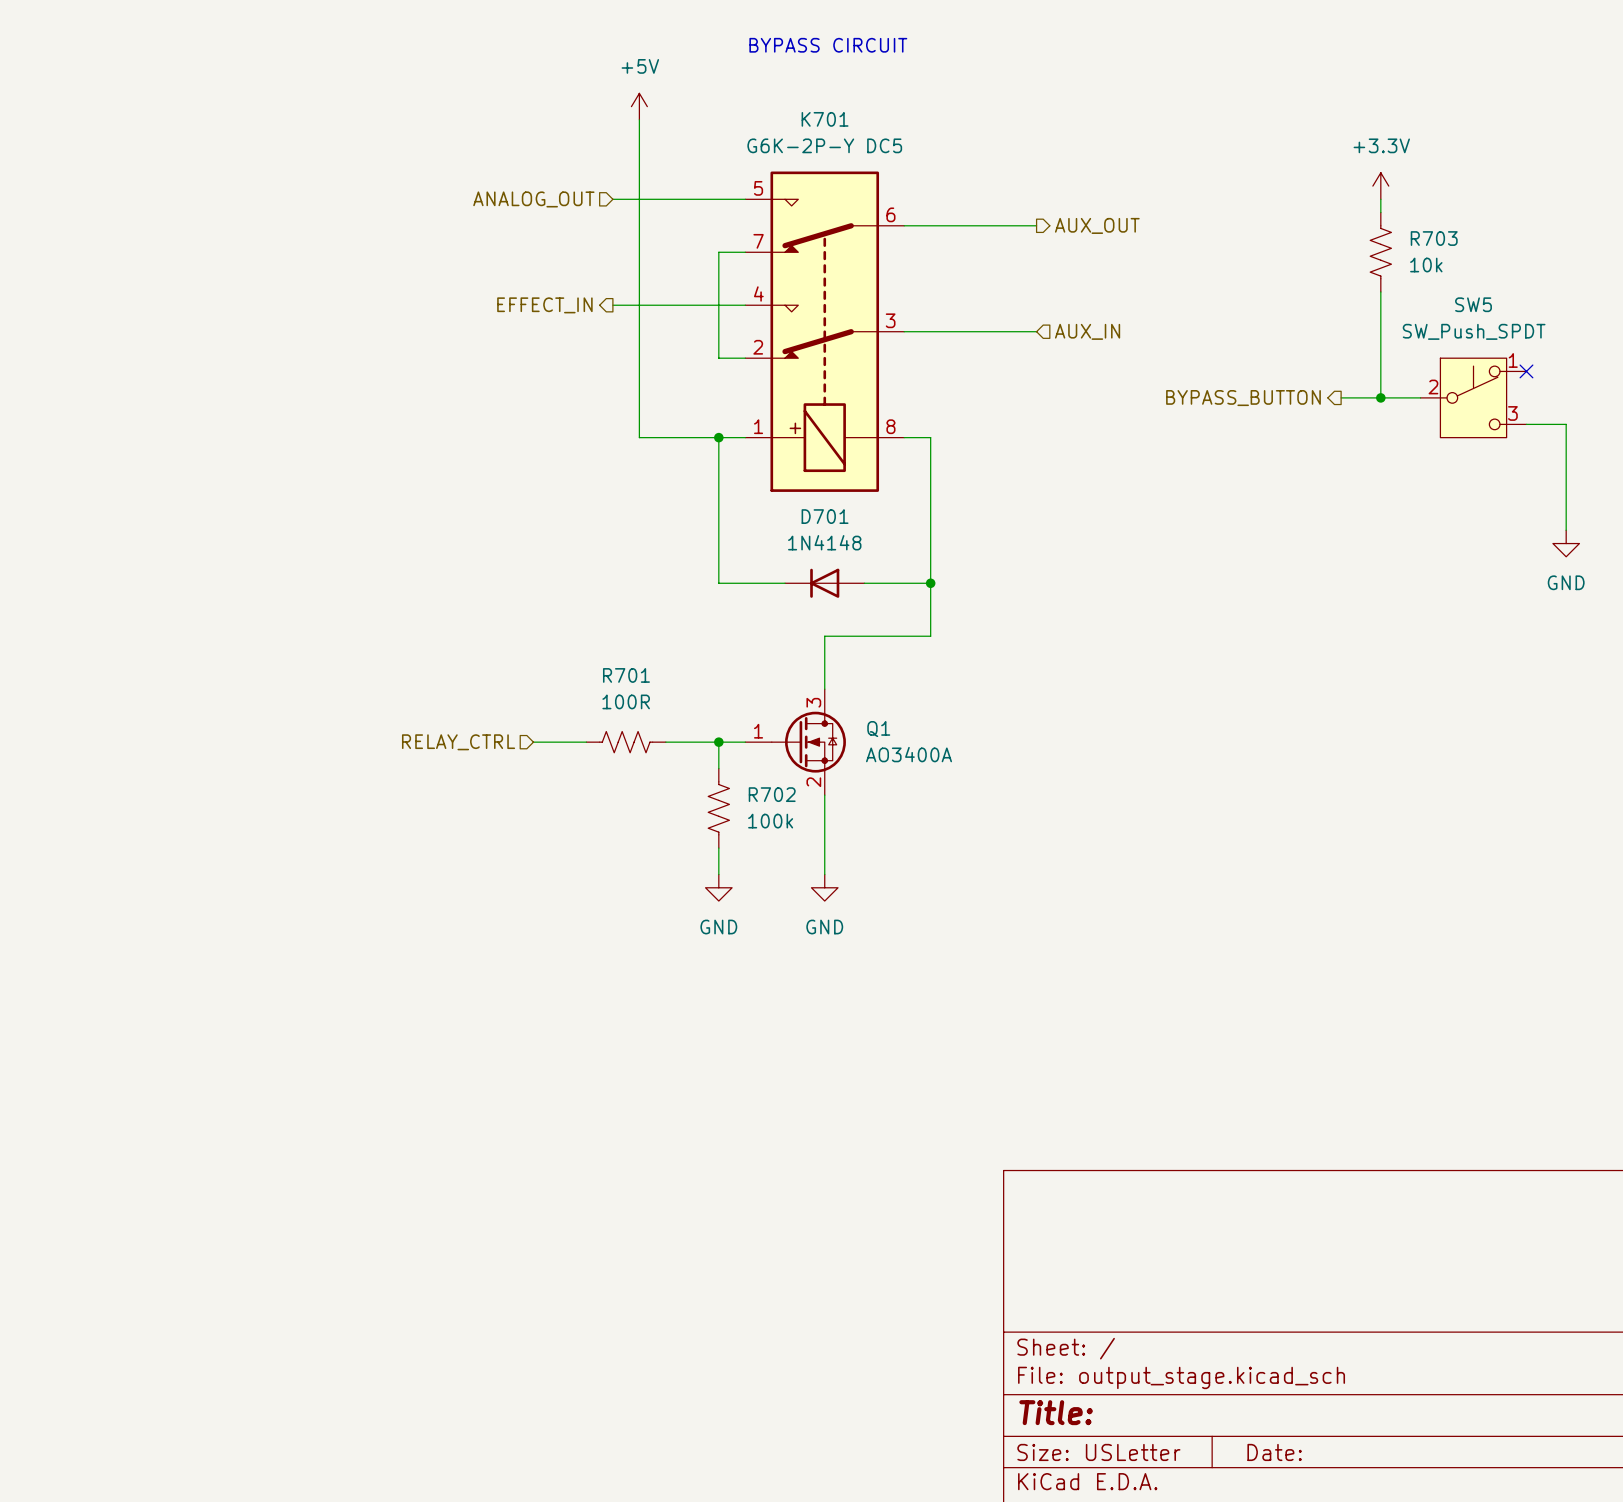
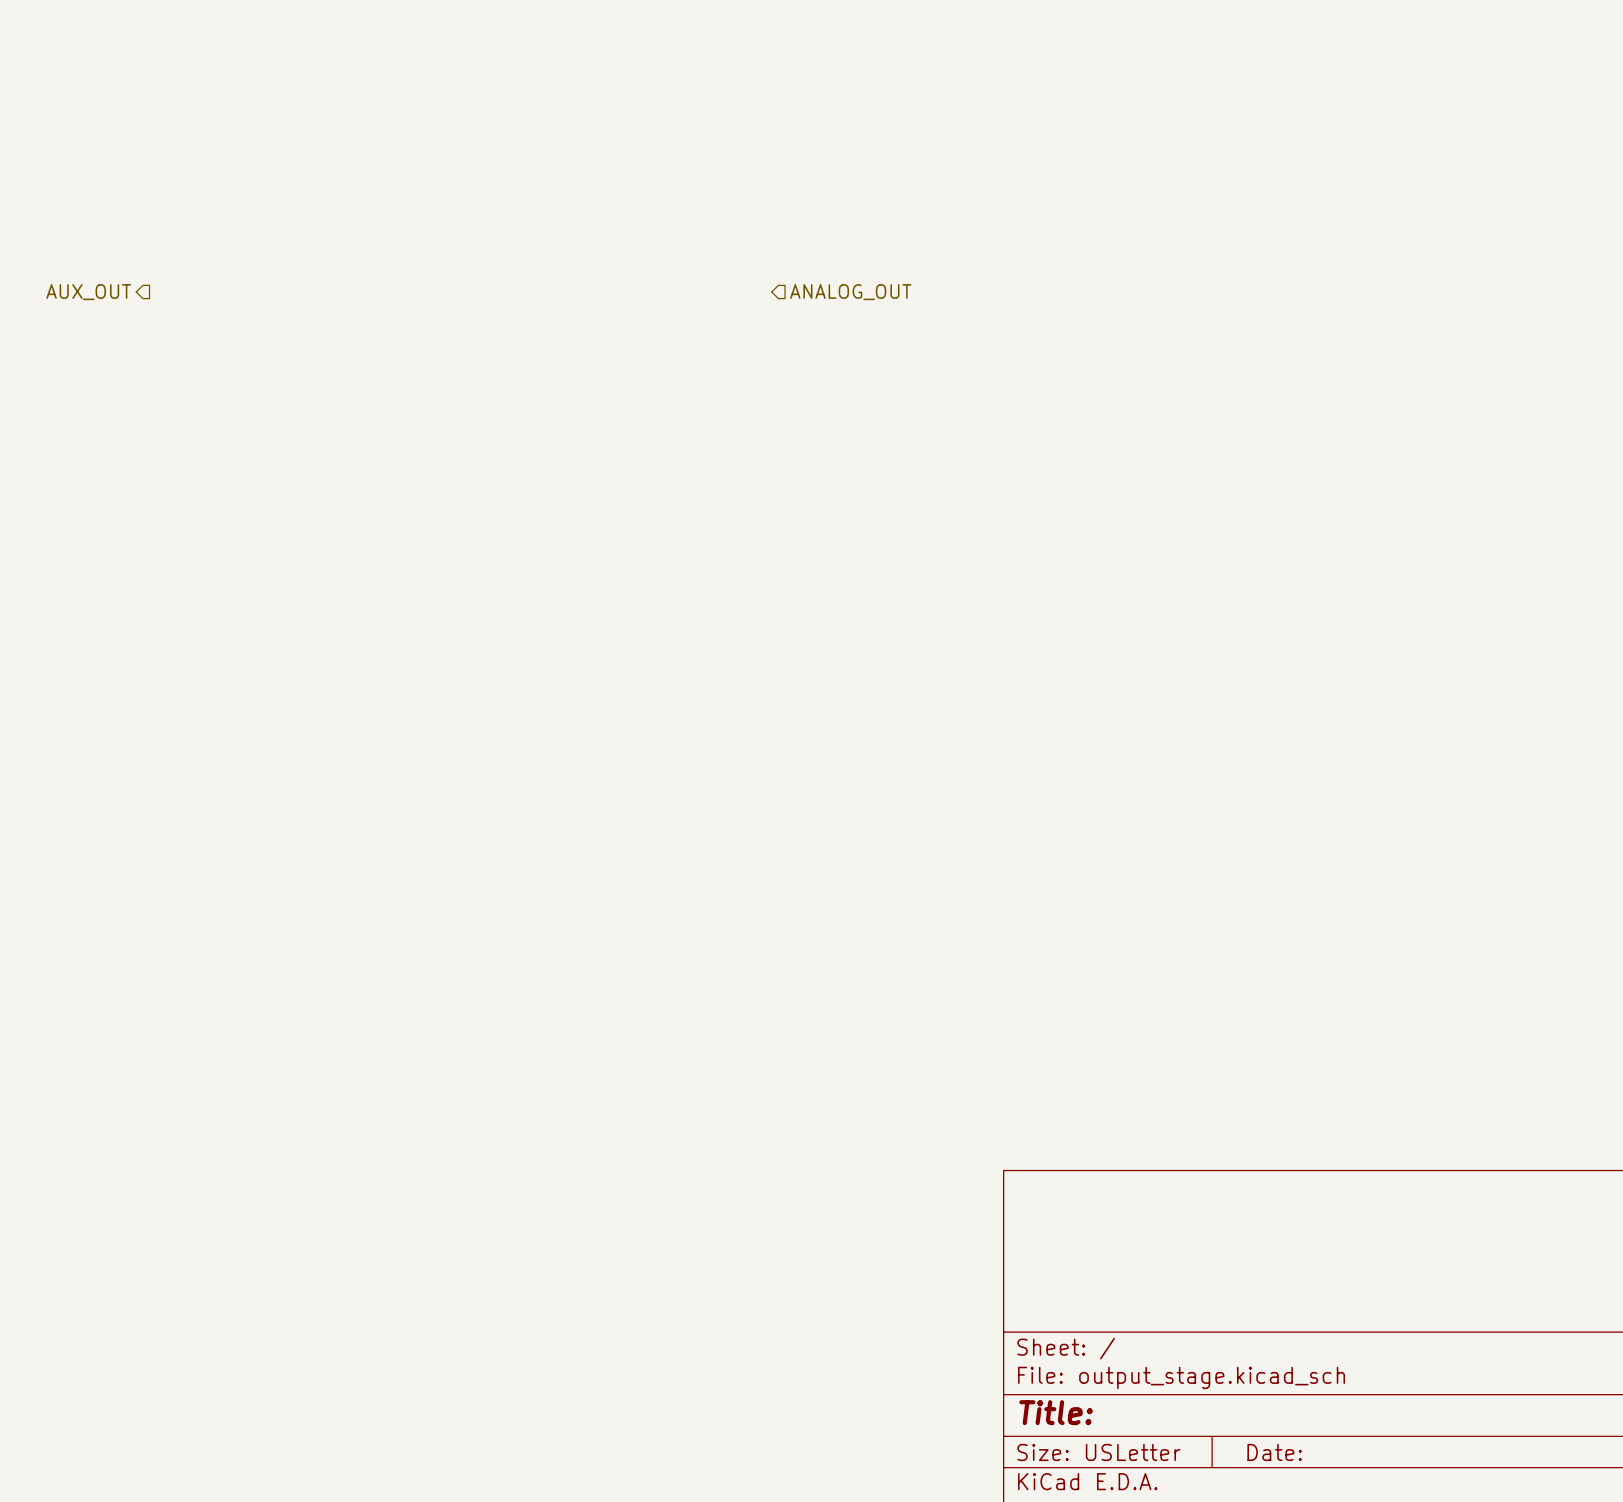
text: BYPASS CIRCUIT (828, 45) -> none
power symbol: +5V (639, 106) -> none
wire: (639, 119) (639, 437) (745, 437) -> none
power symbol: +3.3V (1380, 186) -> none
hierarchical label rotation: 0° (533, 199) -> 180° (850, 292)
hierarchical label position: ANALOG_OUT (533, 199) -> ANALOG_OUT (850, 292)
wire: (612, 199) (745, 199) -> none
wire: (1380, 199) (1380, 212) -> none
wire: (904, 225) (1036, 225) -> none
hierarchical label: AUX_OUT (1097, 225) -> none
wire: (745, 252) (718, 252) (718, 358) (745, 358) -> none
R703: 10k (1380, 252) -> none
wire: (1380, 291) (1380, 397) -> none
hierarchical label: none -> AUX_OUT (88, 292)
hierarchical label: EFFECT_IN (544, 305) -> none
wire: (612, 305) (745, 305) -> none
K701: G6K-2P-Y DC5 (824, 331) -> none
wire: (904, 331) (1036, 331) -> none
hierarchical label: AUX_IN (1087, 331) -> none
no-connect mark: (1526, 371) -> none
wire: (1341, 397) (1420, 397) -> none
junction: (1380, 397) -> none
SW5: SW_Push_SPDT (1473, 397) -> none
hierarchical label: BYPASS_BUTTON (1243, 398) -> none
wire: (1526, 424) (1566, 424) (1566, 530) -> none
wire: (718, 437) (718, 583) (785, 583) -> none
junction: (718, 437) -> none
wire: (904, 437) (930, 437) (930, 636) (824, 636) (824, 689) -> none
power symbol: GND (1566, 543) -> none
D701: 1N4148 (824, 583) -> none
wire: (864, 583) (930, 583) -> none
junction: (930, 583) -> none
hierarchical label: RELAY_CTRL (458, 742) -> none
wire: (533, 742) (586, 742) -> none
R701: 100R (626, 742) -> none
wire: (665, 742) (745, 742) -> none
wire: (718, 742) (718, 768) -> none
junction: (718, 742) -> none
Q1: AO3400A (795, 742) -> none
wire: (824, 795) (824, 874) -> none
R702: 100k (718, 808) -> none
wire: (718, 848) (718, 874) -> none
power symbol: GND (718, 887) -> none
power symbol: GND (824, 887) -> none

